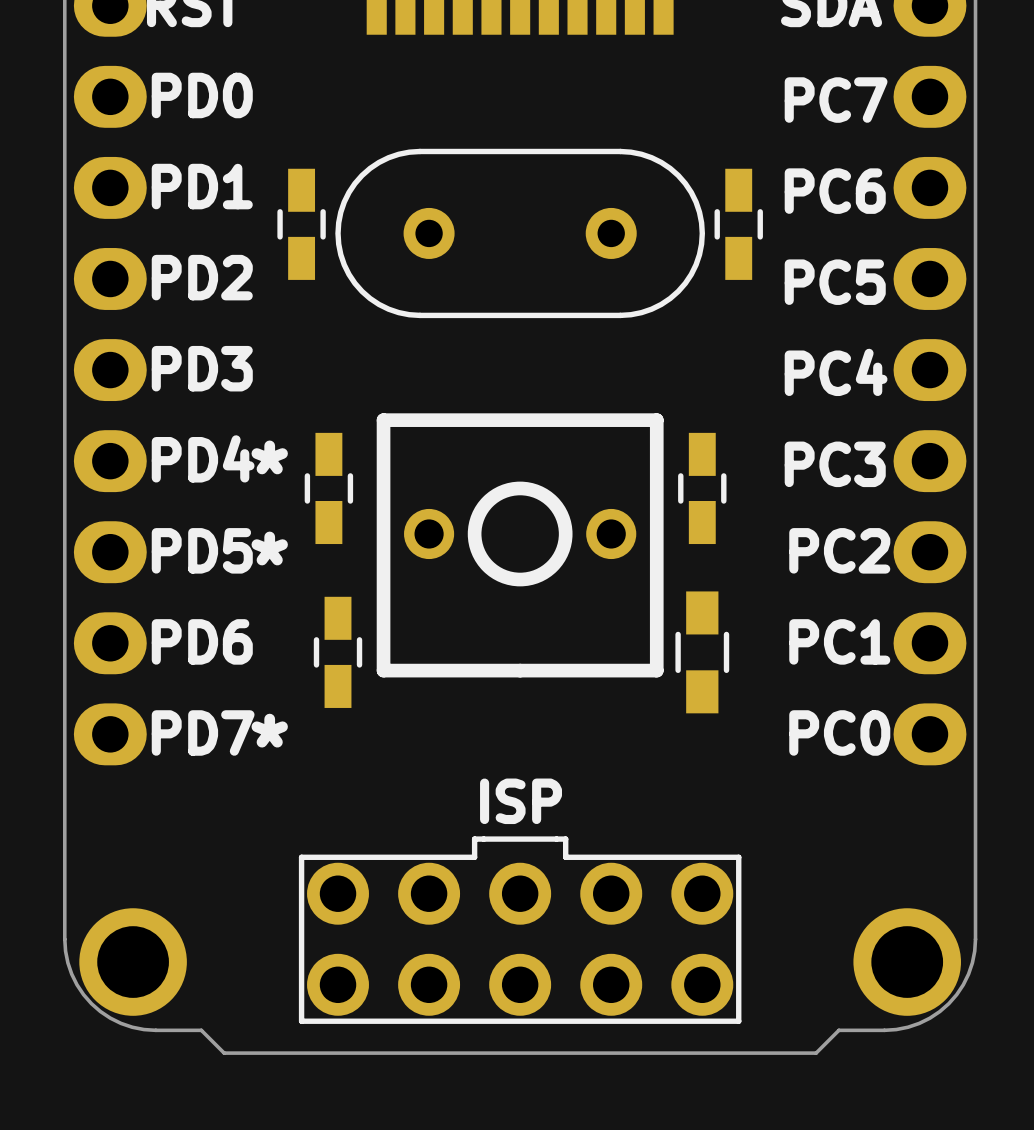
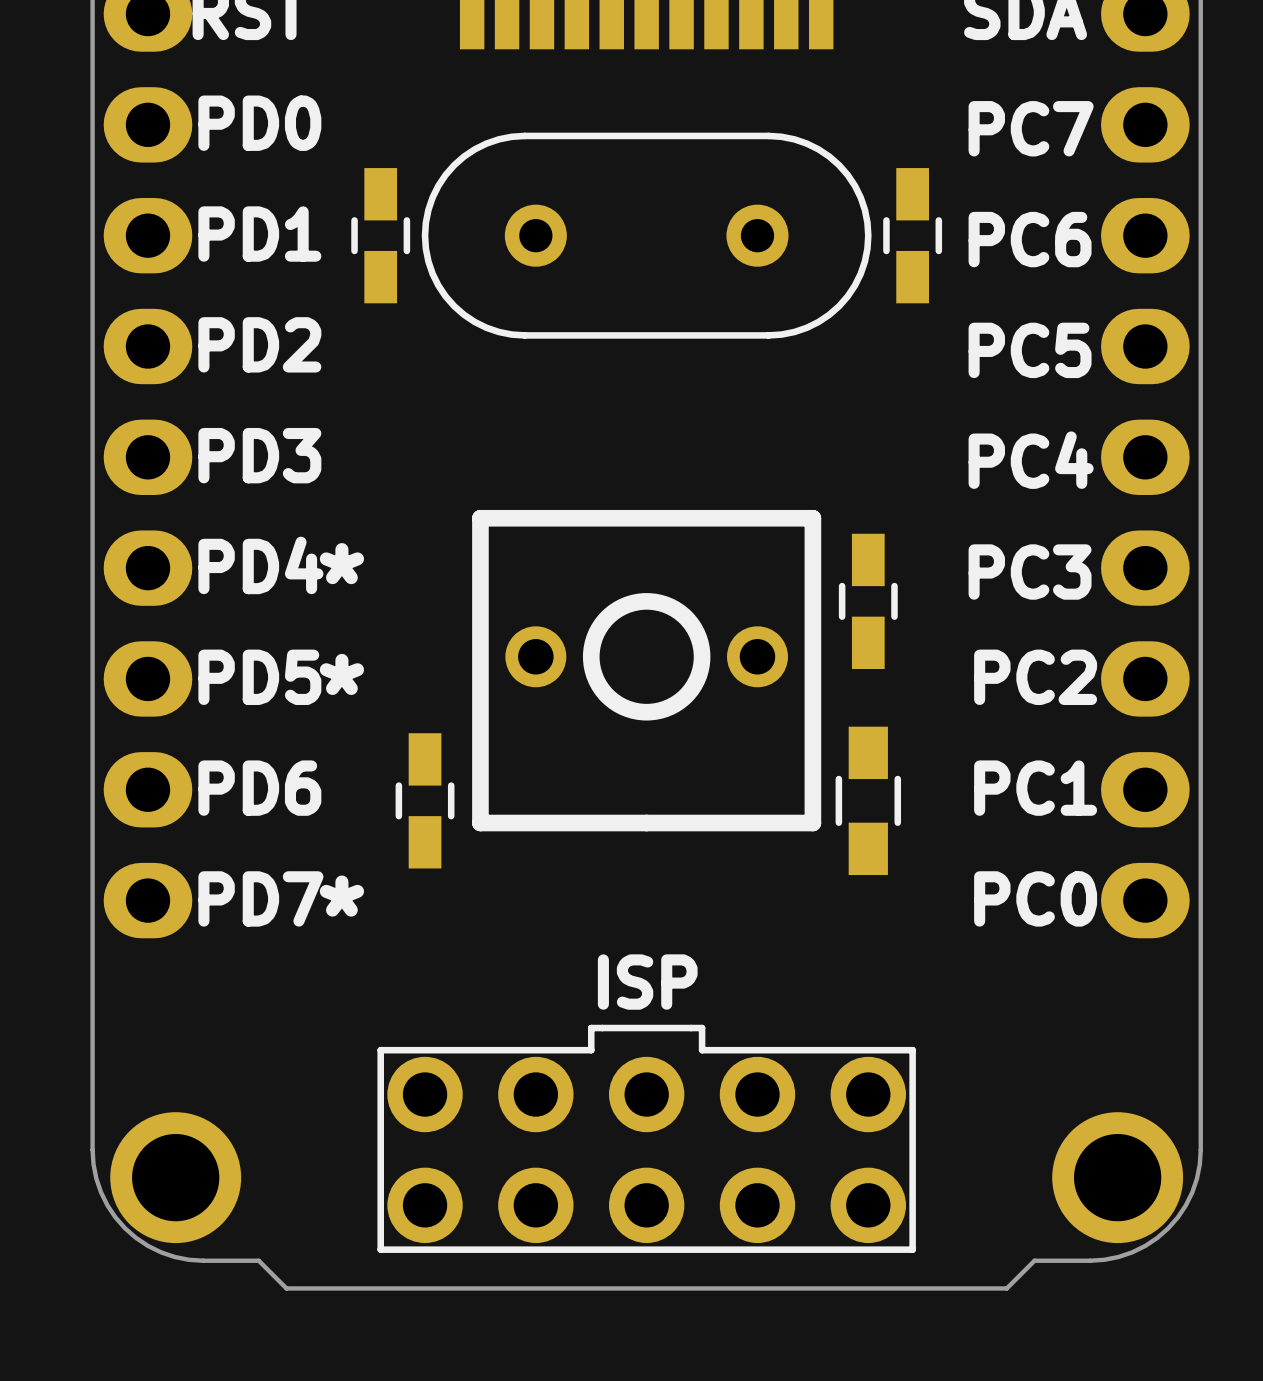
part position: (301, 224) -> (380, 235)
part position: (738, 224) -> (912, 235)
part position: (520, 233) -> (646, 235)
part: (328, 488) -> none

